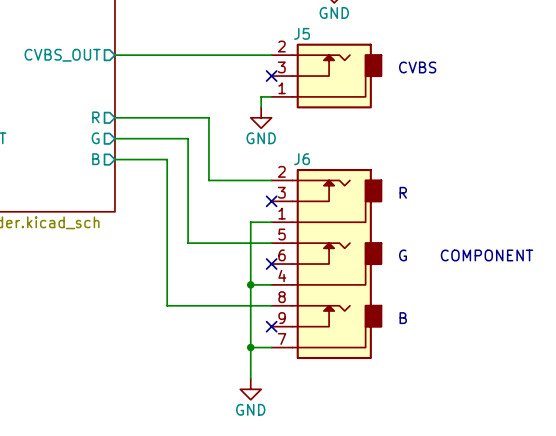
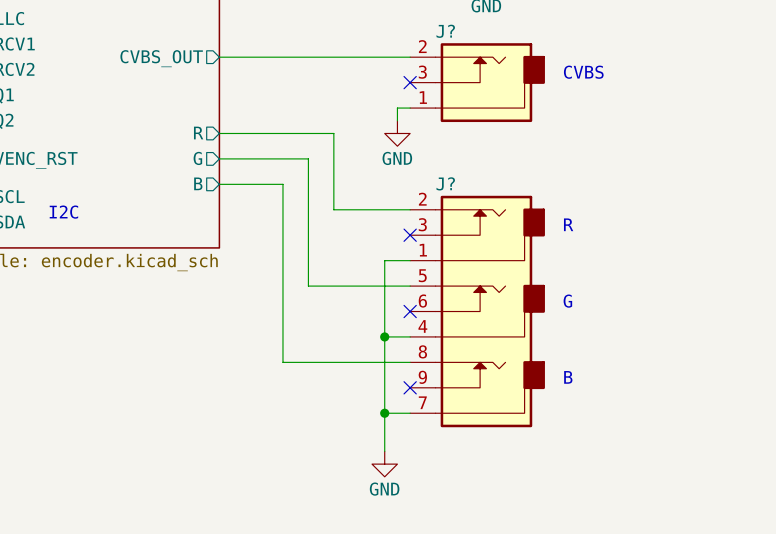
J5 name: J5 (302, 33) -> J? (445, 31)
J6 name: J6 (302, 159) -> J? (445, 183)
text: COMPONENT (487, 255) -> none

